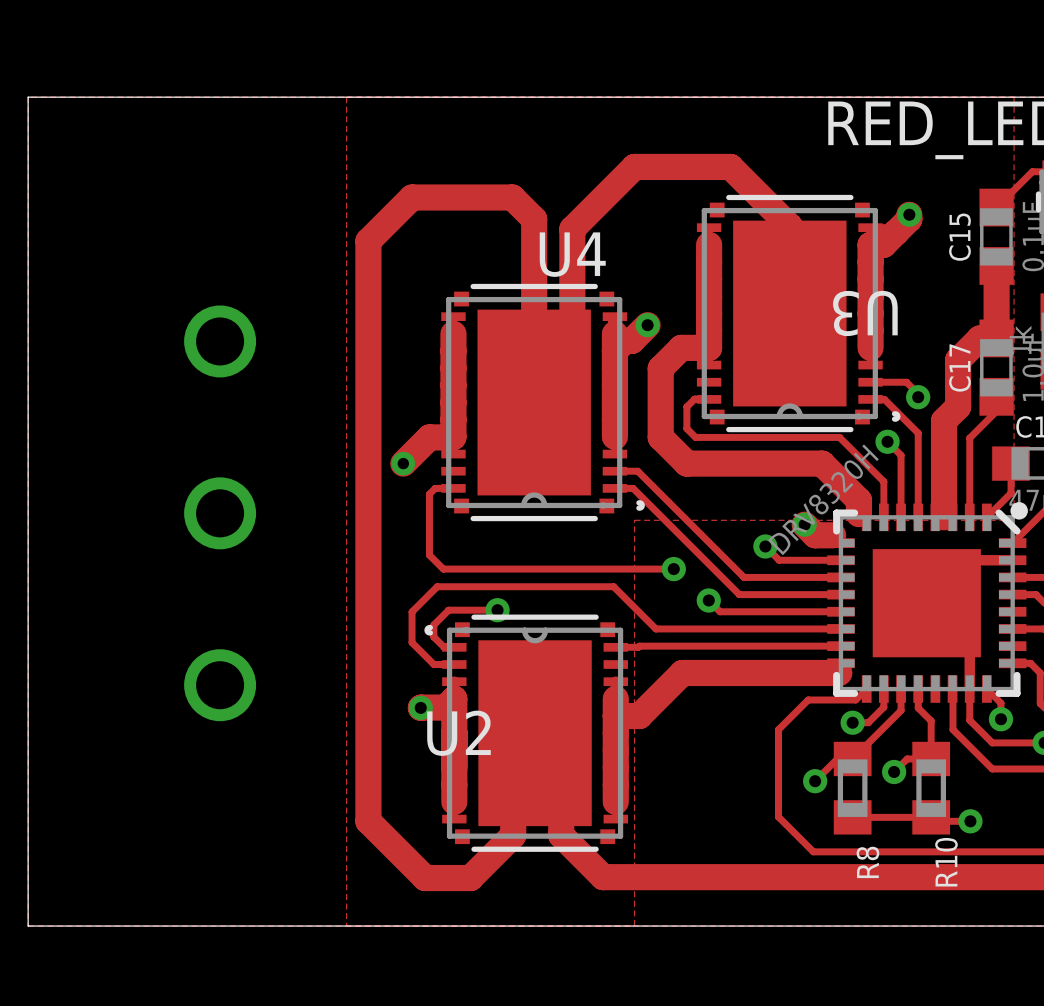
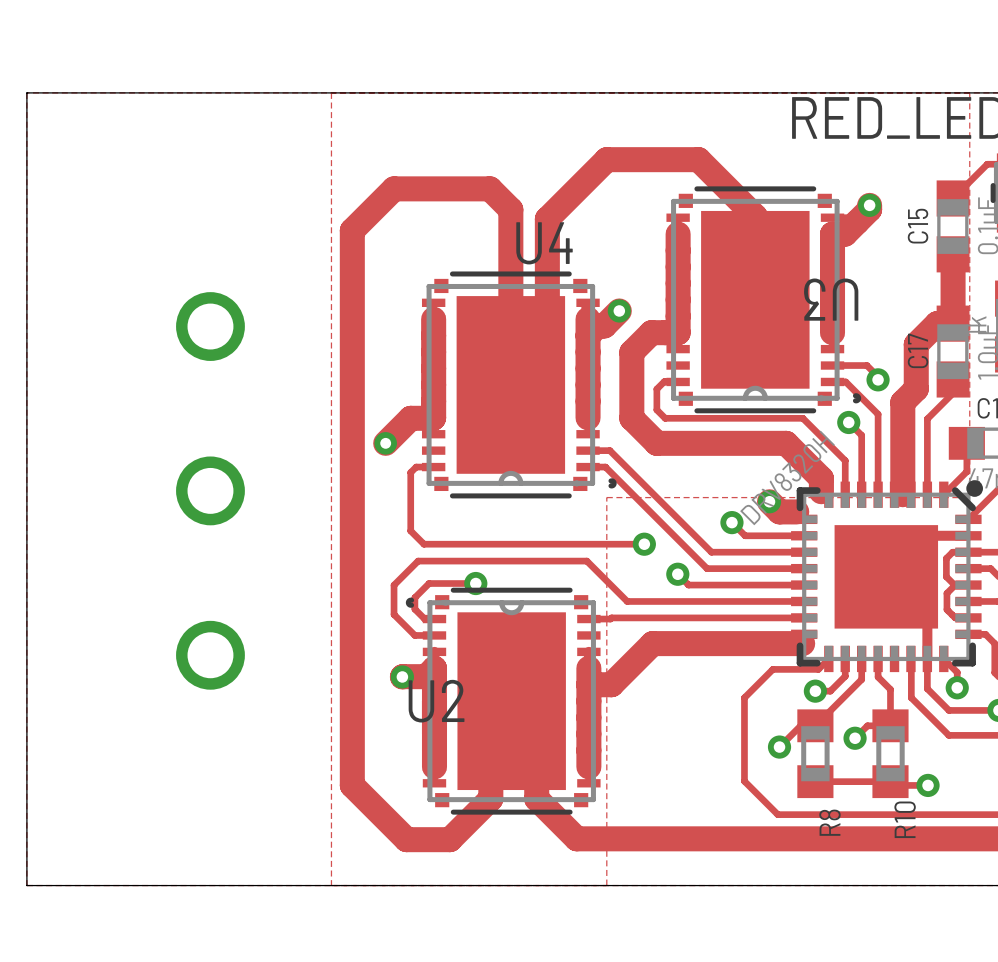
track: none -> (968, 552) (952, 552) (946, 558) (946, 576) (954, 585) (968, 585)
track: none -> (954, 585) (946, 593) (946, 609) (955, 617) (968, 617)

